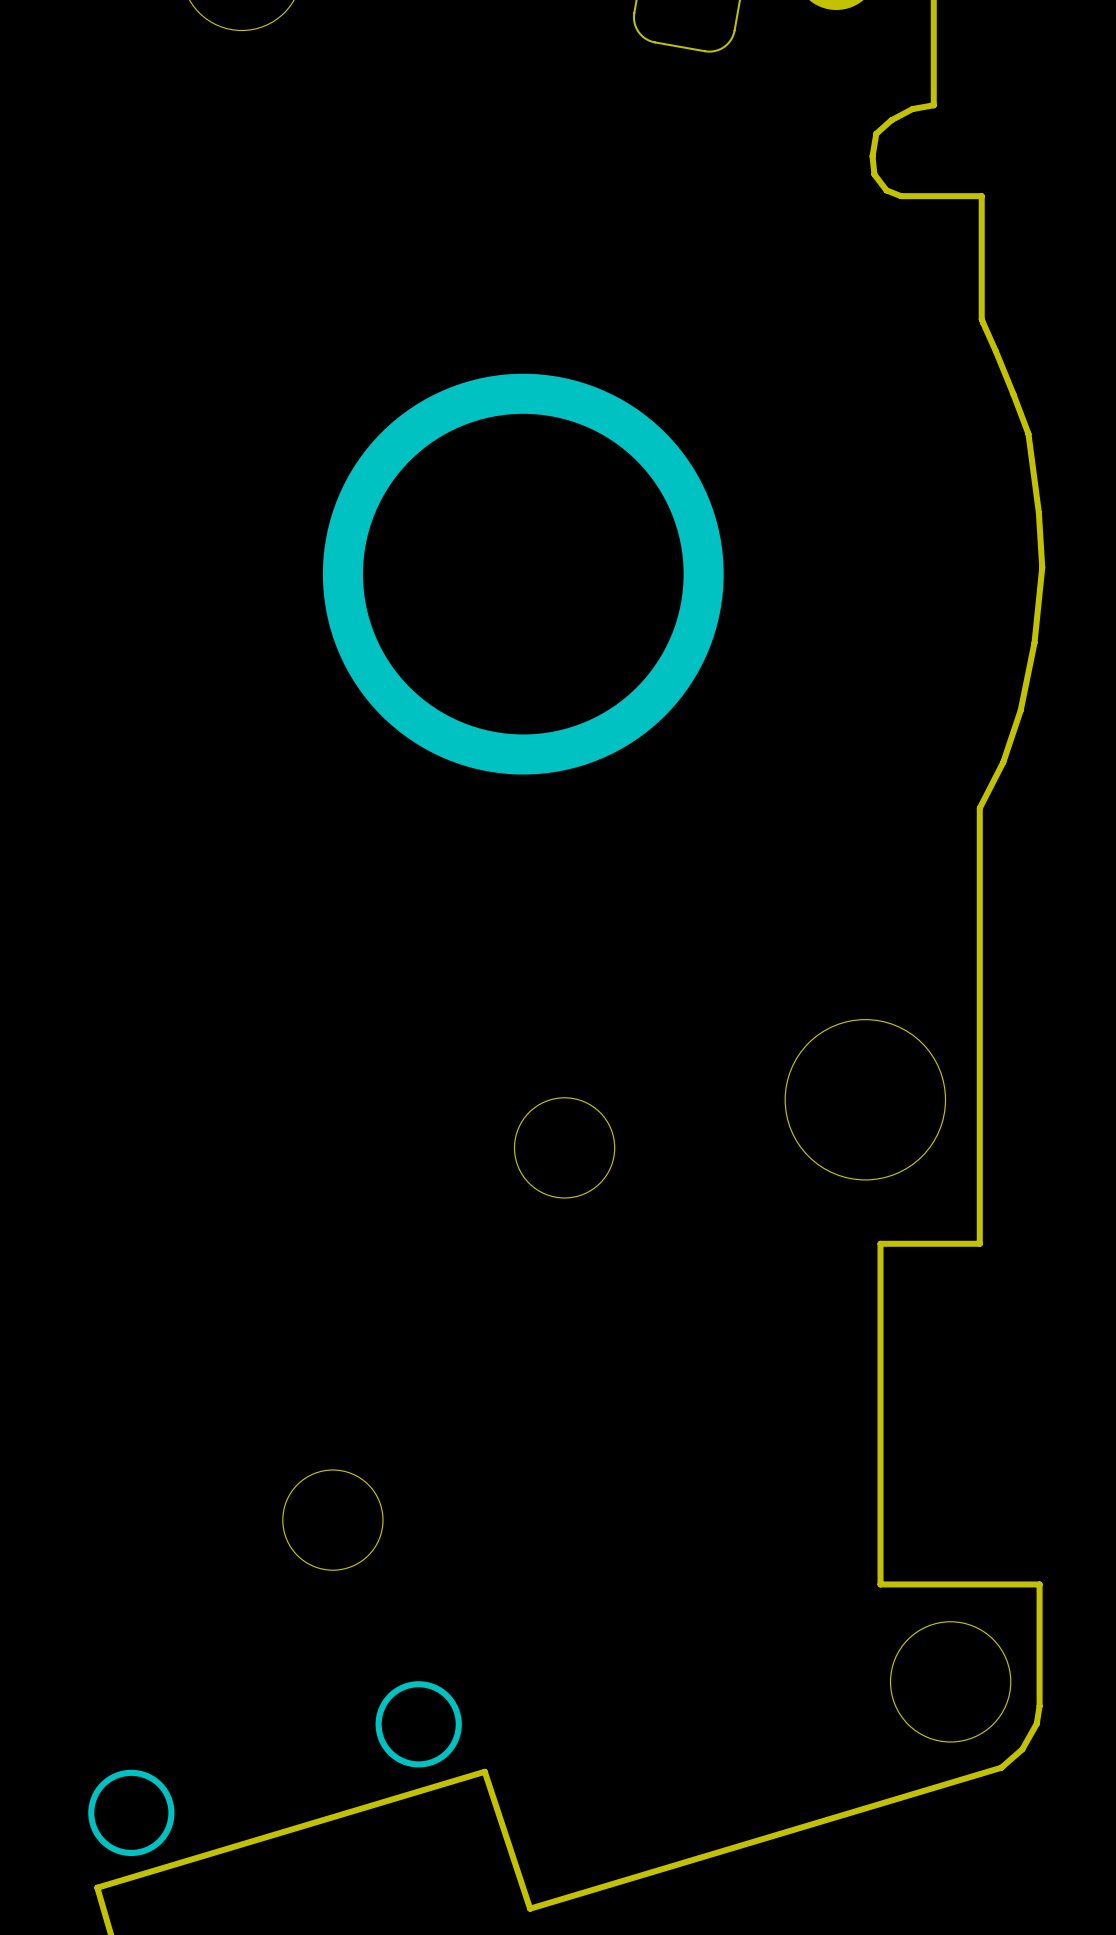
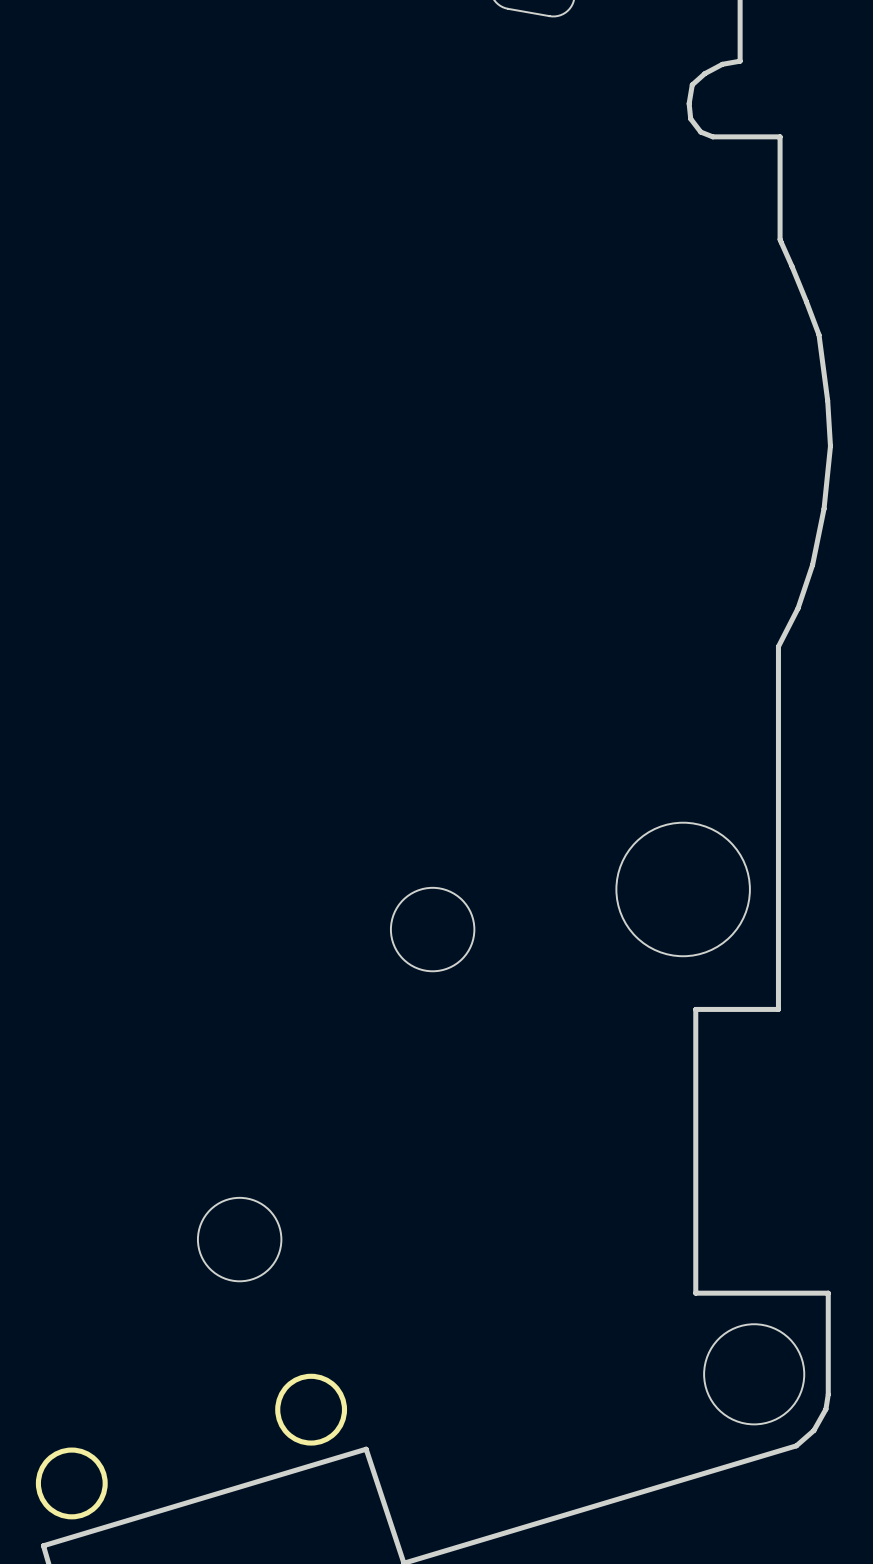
part: (523, 574) -> none

